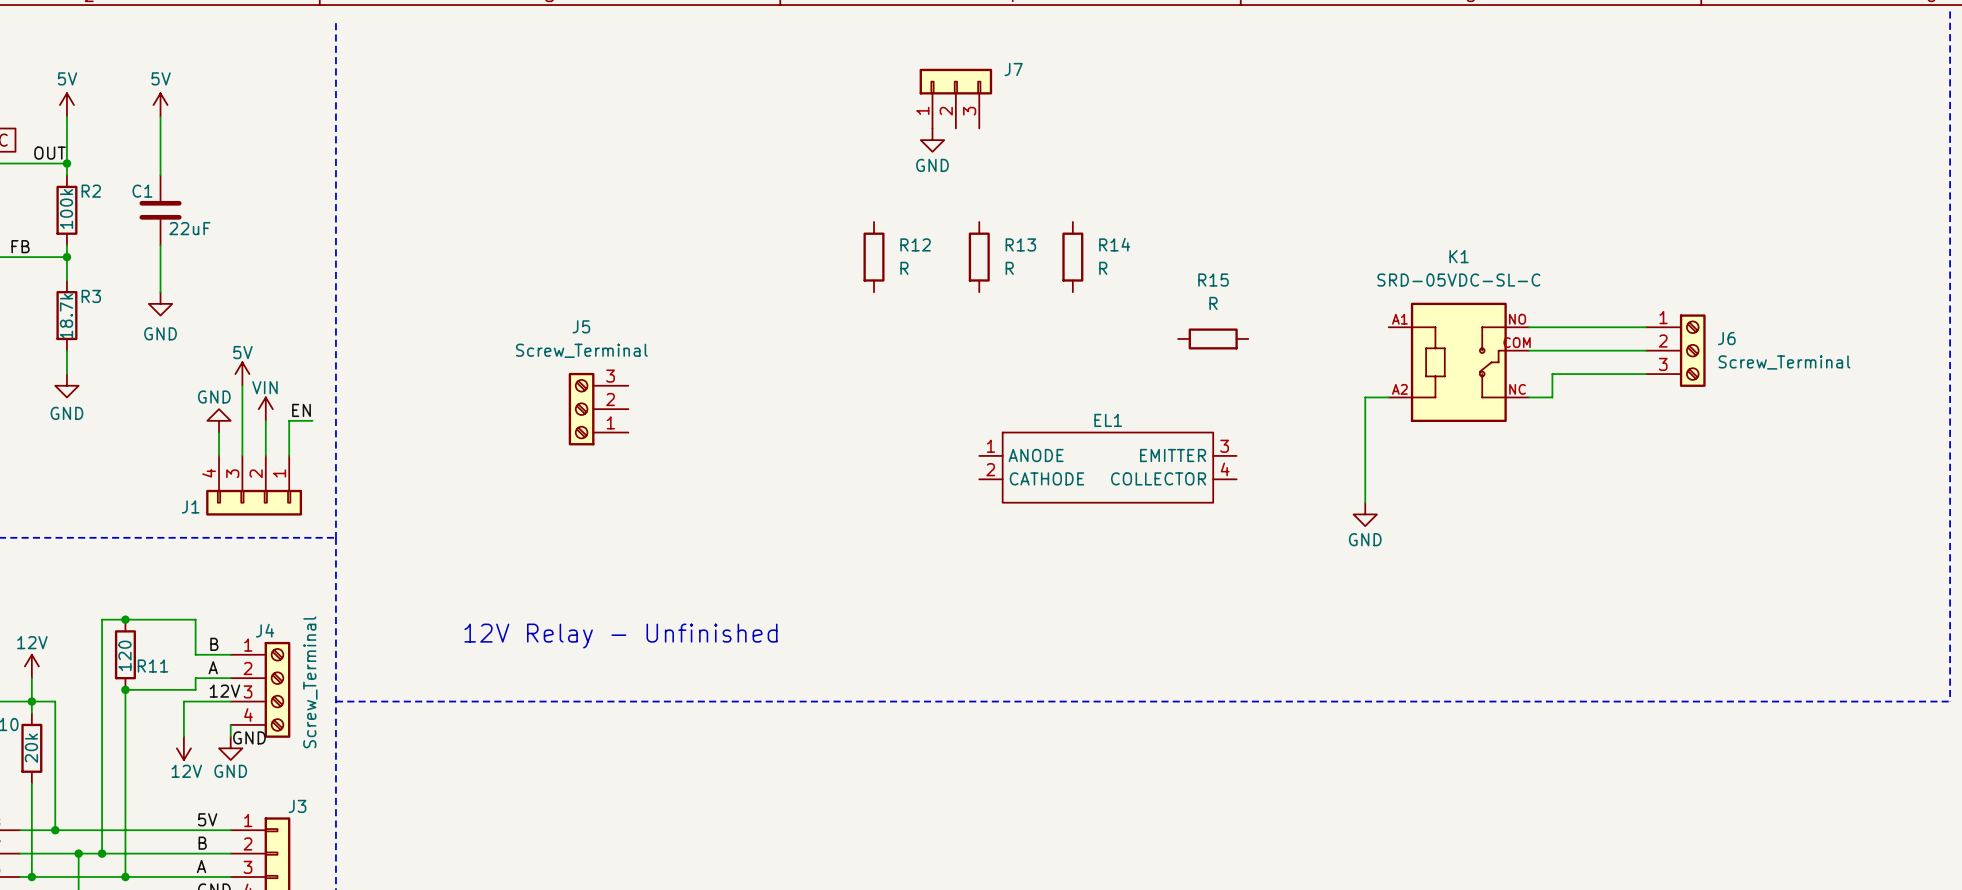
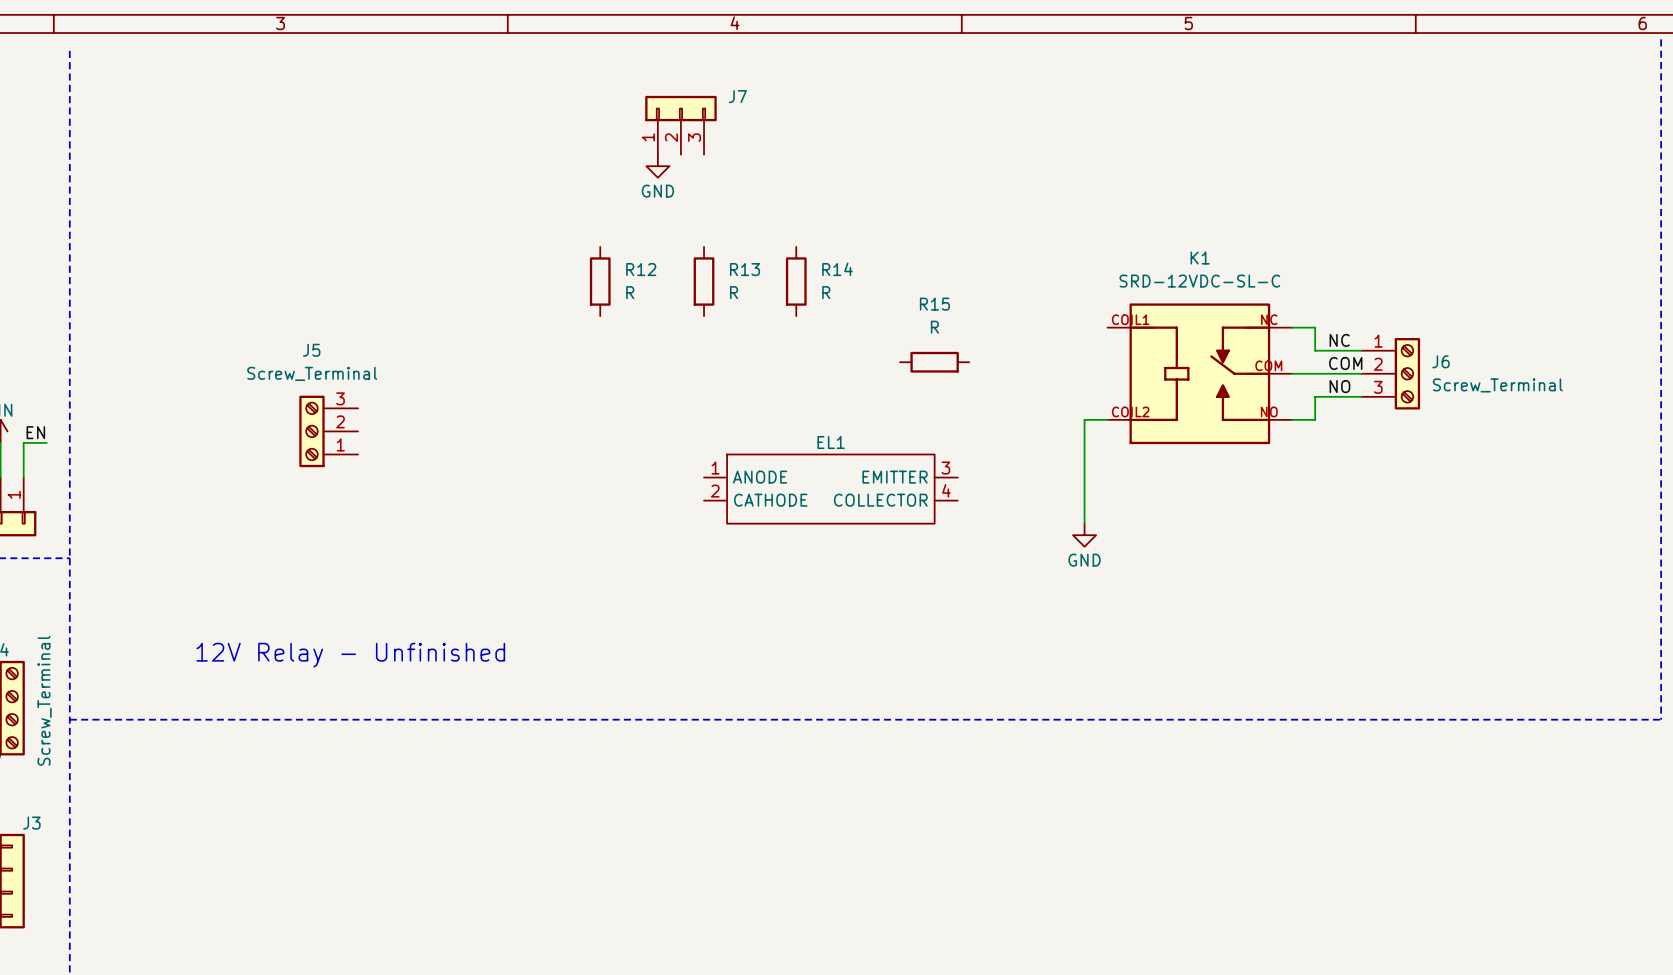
K1 value: SRD-05VDC-SL-C (1458, 280) -> SRD-12VDC-SL-C (1199, 281)
K1 symbol: [1388, 302, 1530, 423] -> [1107, 303, 1293, 445]
label: none -> NC (1339, 340)
wire: (1529, 327) (1599, 327) -> (1292, 327) (1315, 327) (1315, 350)
label: none -> COM (1345, 363)
label: none -> NO (1339, 386)
wire: (1599, 374) (1552, 374) (1552, 397) (1529, 397) -> (1315, 396) (1315, 419) (1292, 419)

